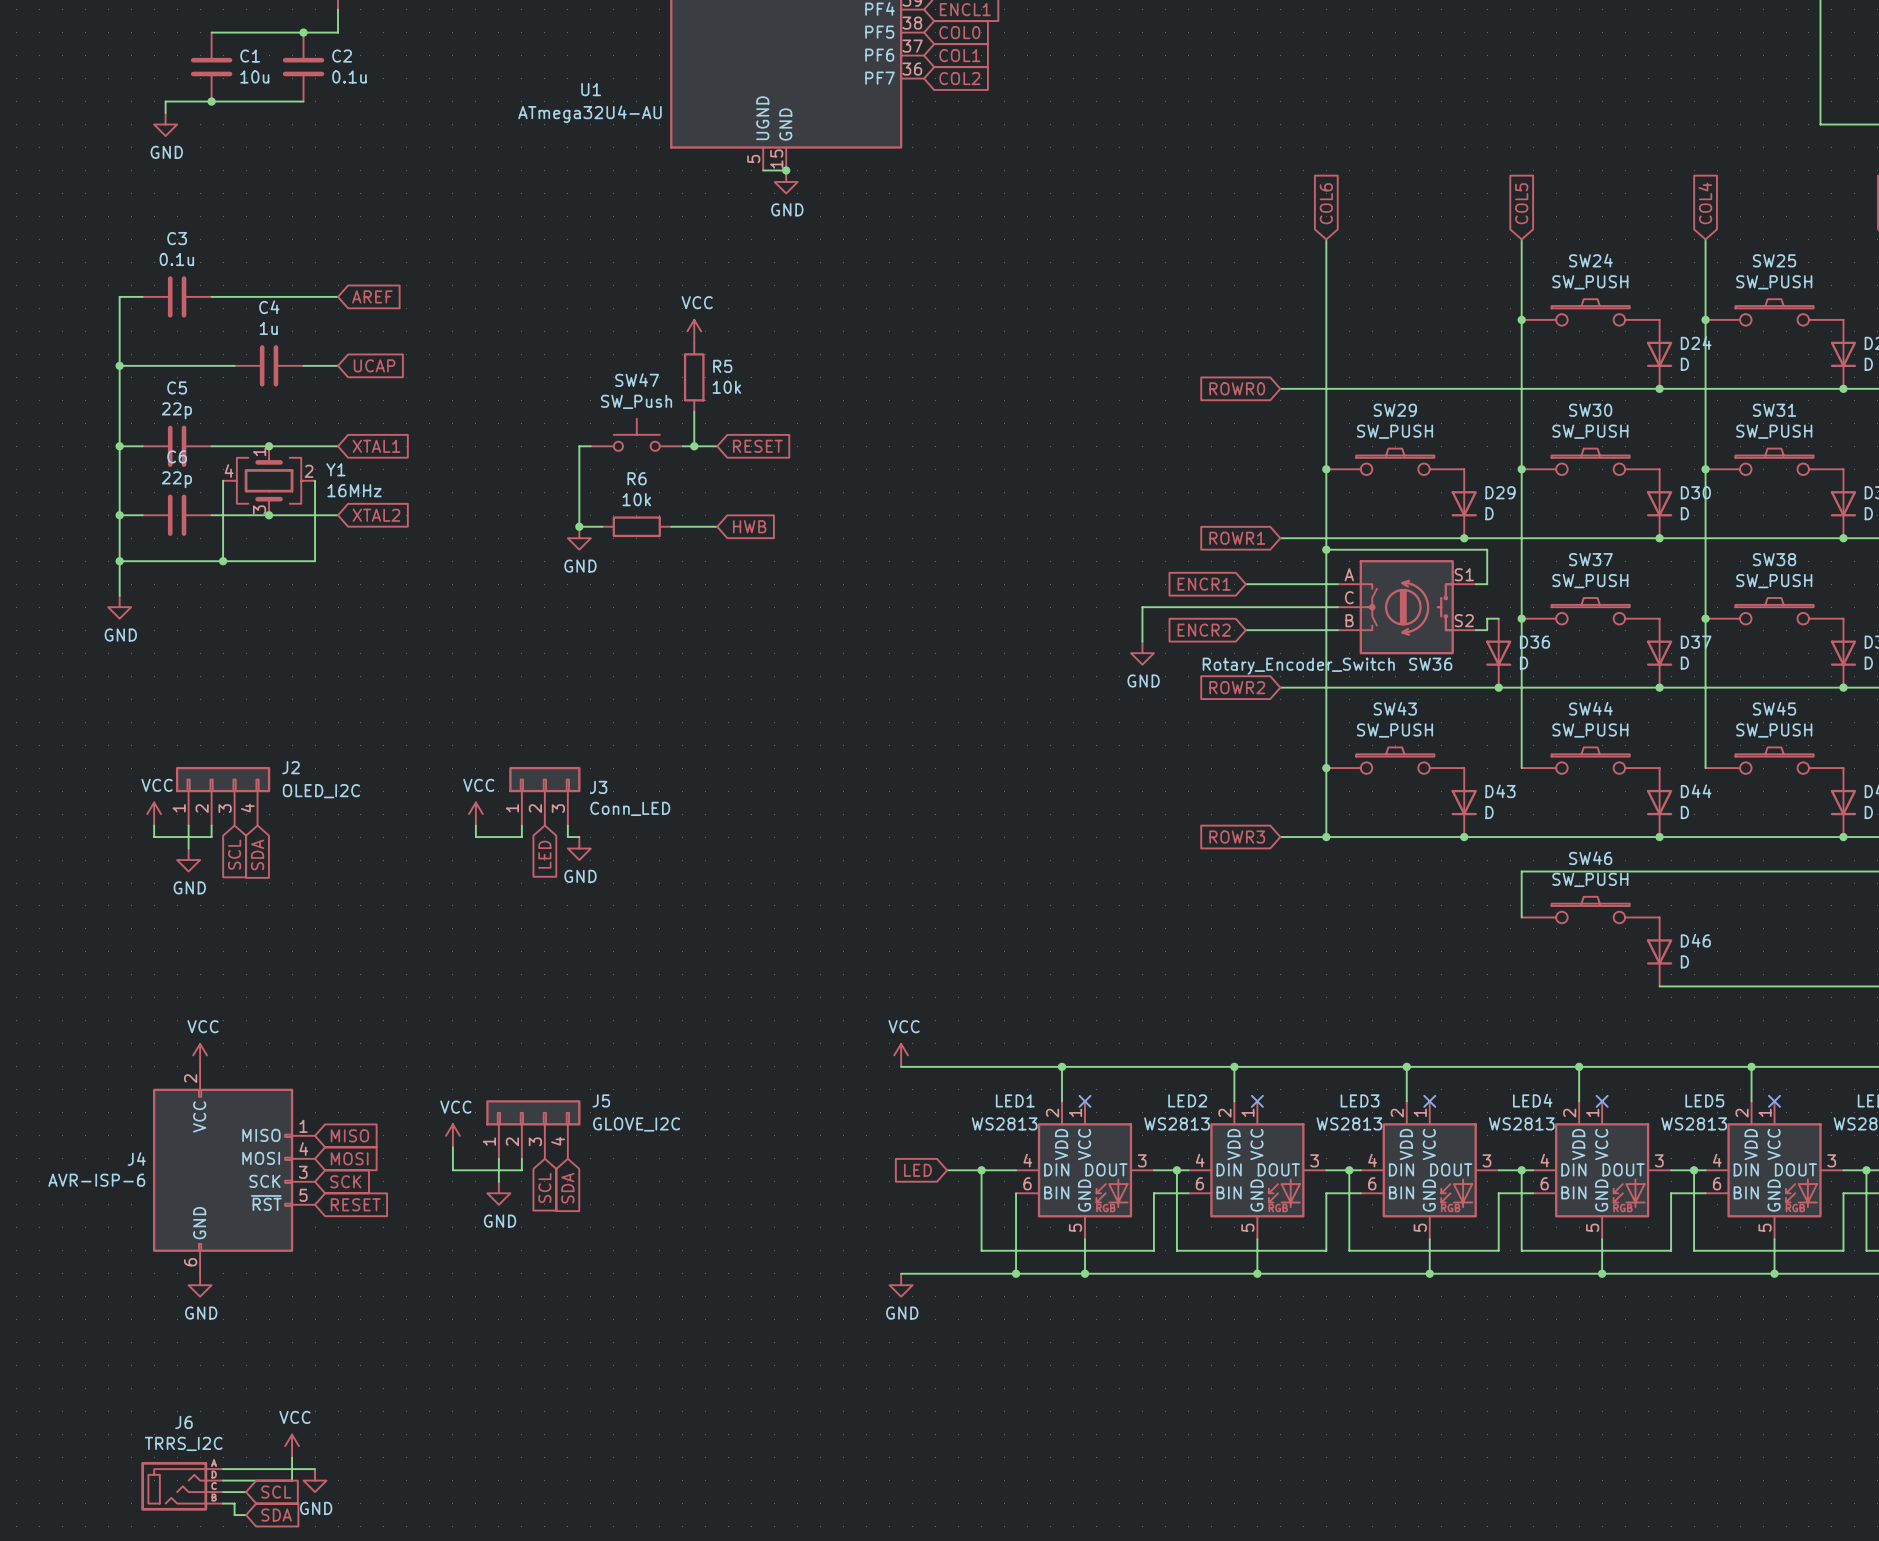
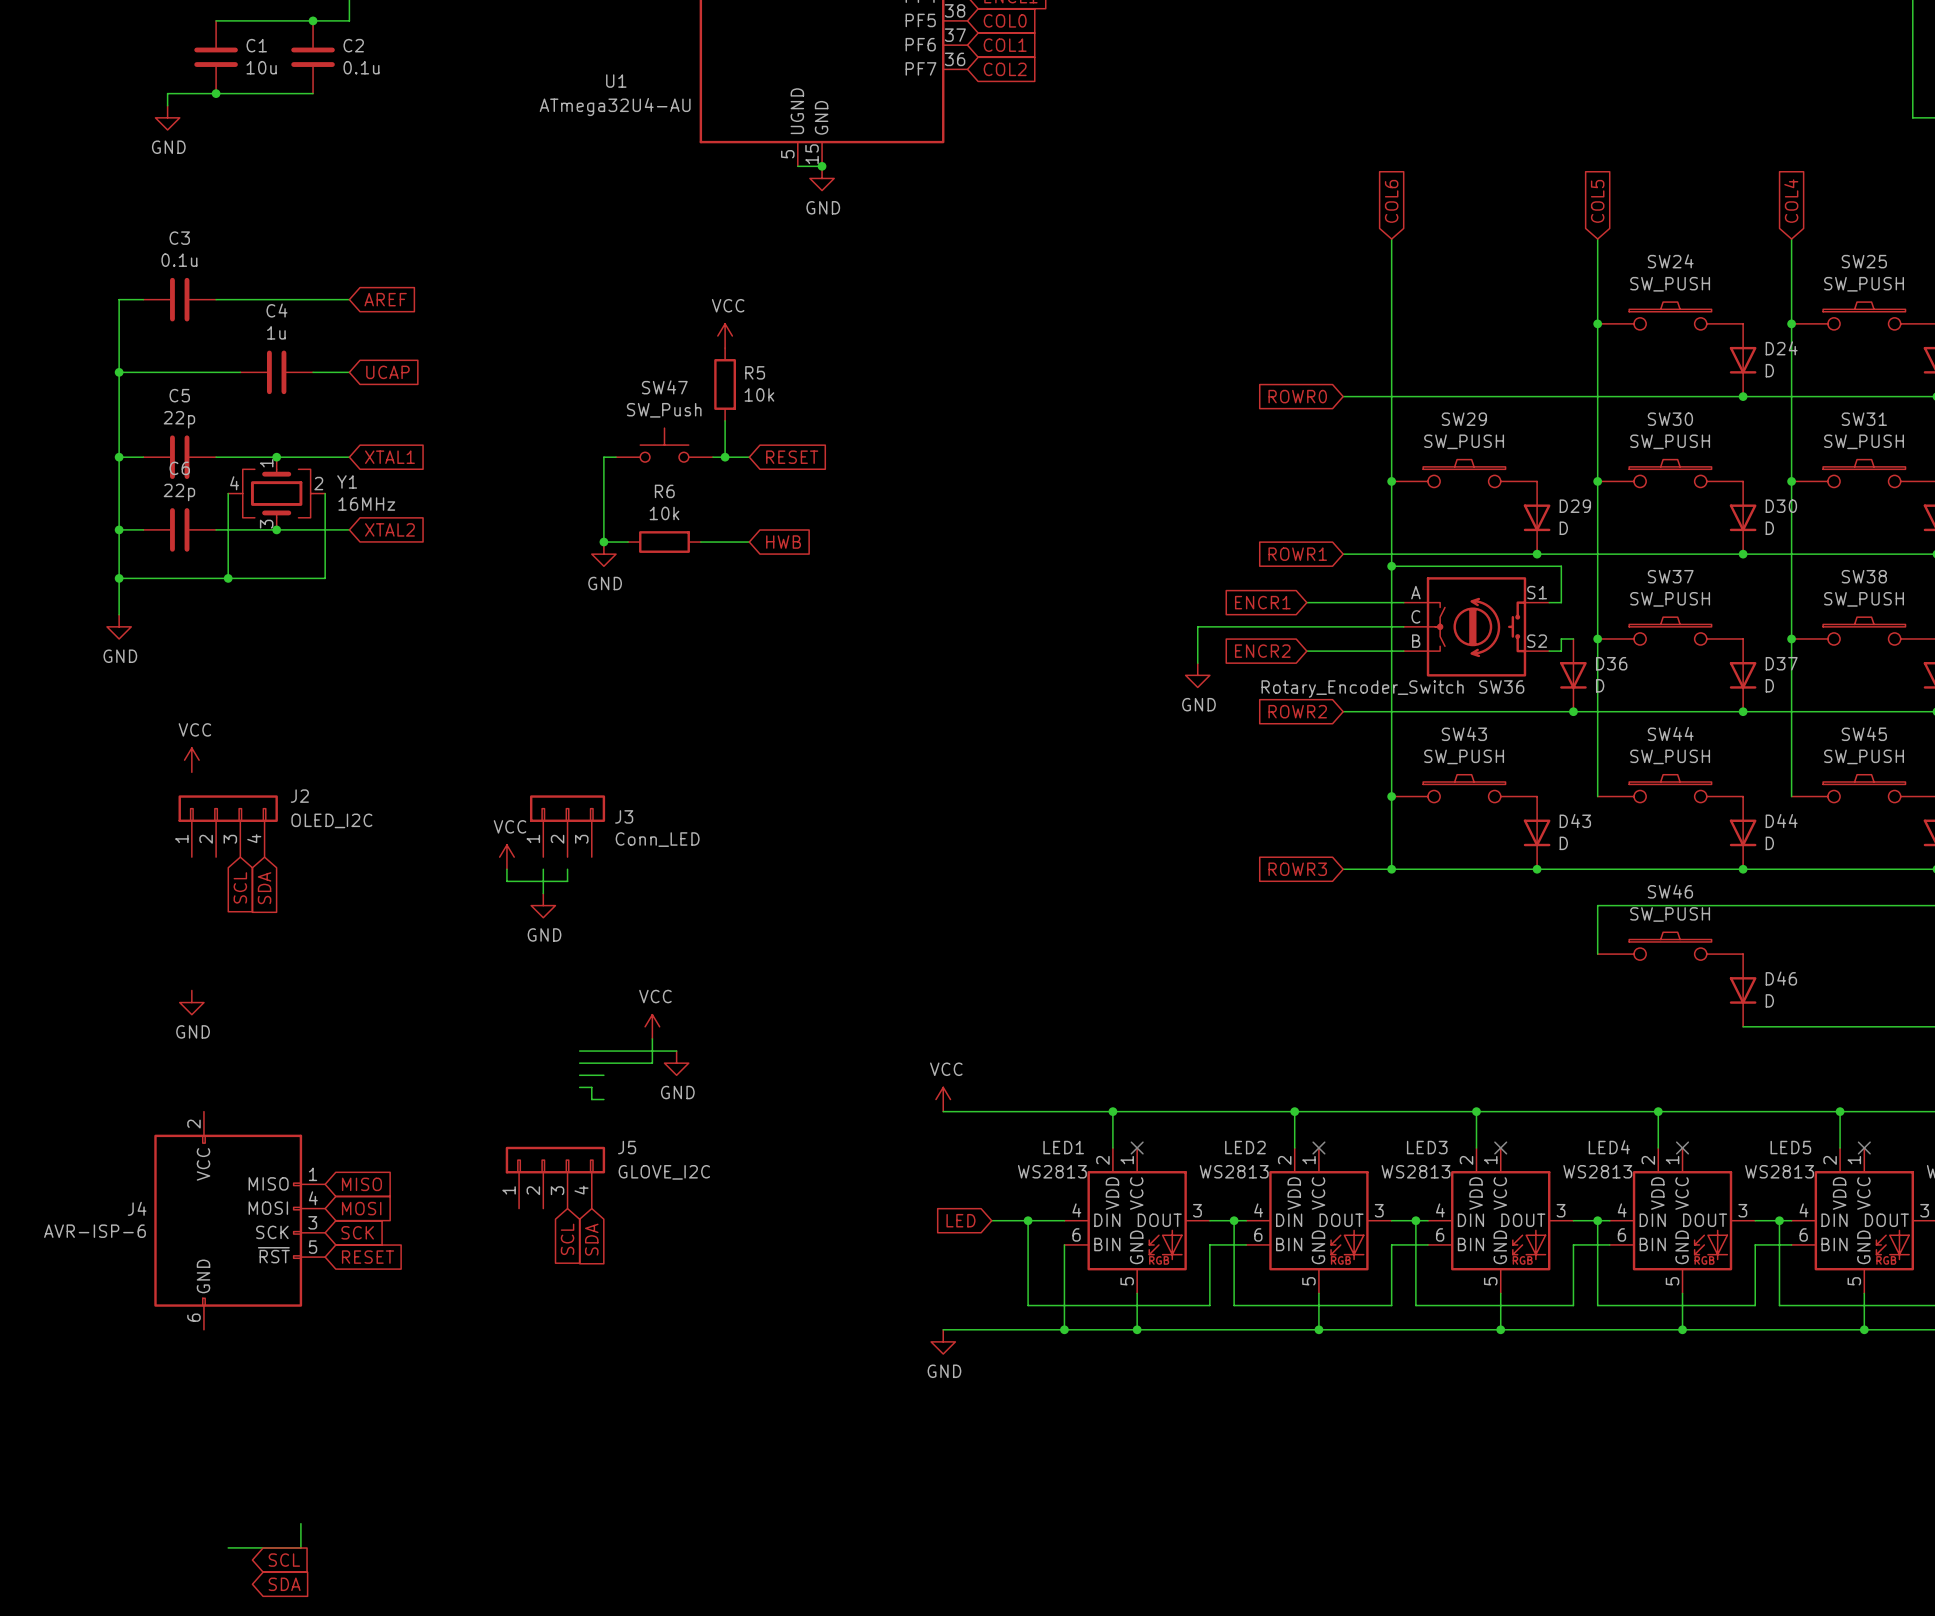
power symbol position: VCC (154, 814) -> VCC (191, 760)
power symbol position: VCC (475, 814) -> VCC (506, 857)
wire: (154, 825) (154, 837) (211, 837) (211, 825) -> none
wire: (188, 825) (188, 848) -> none
wire: (475, 825) (475, 837) (521, 837) (521, 825) -> none
wire: (567, 825) (567, 837) (579, 837) -> none
wire: none -> (506, 869) (506, 881) (567, 881) (567, 869)
wire: none -> (543, 869) (543, 893)
power symbol position: GND (579, 848) -> GND (543, 905)
global label: LED (544, 854) -> none
power symbol position: GND (188, 860) -> GND (191, 1002)
power symbol: none -> VCC (652, 1026)
wire: none -> (652, 1038) (652, 1063) (579, 1063)
wire: none -> (579, 1051) (676, 1051)
power symbol: none -> GND (676, 1063)
wire: none -> (579, 1075) (603, 1075)
wire: none -> (579, 1087) (591, 1087) (591, 1099) (603, 1099)
power symbol: VCC (200, 1055) -> none
power symbol: VCC (452, 1135) -> none
wire: (452, 1147) (452, 1170) (521, 1170) (521, 1158) -> none
wire: (498, 1158) (498, 1181) -> none
power symbol: GND (498, 1193) -> none
power symbol: GND (200, 1285) -> none
power symbol: VCC (292, 1446) -> none
wire: (223, 1469) (315, 1469) -> none
power symbol: GND (315, 1480) -> none
J6: TRRS_I2C (182, 1486) -> none
wire: (223, 1492) (246, 1492) -> none
wire: (223, 1503) (234, 1503) (234, 1515) (246, 1515) -> none

